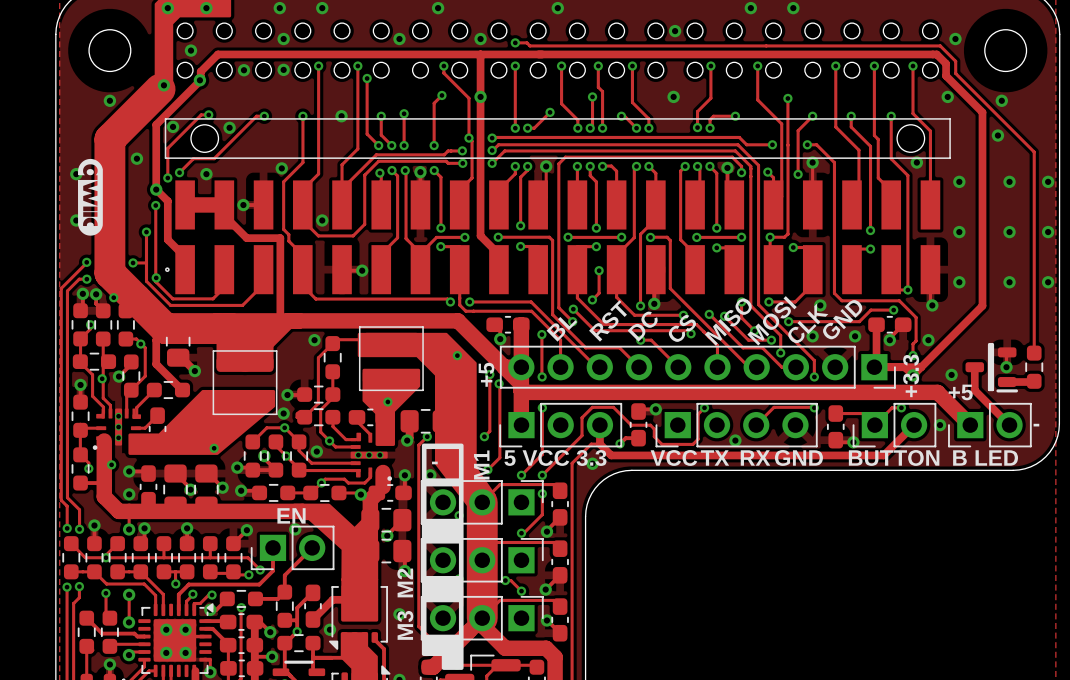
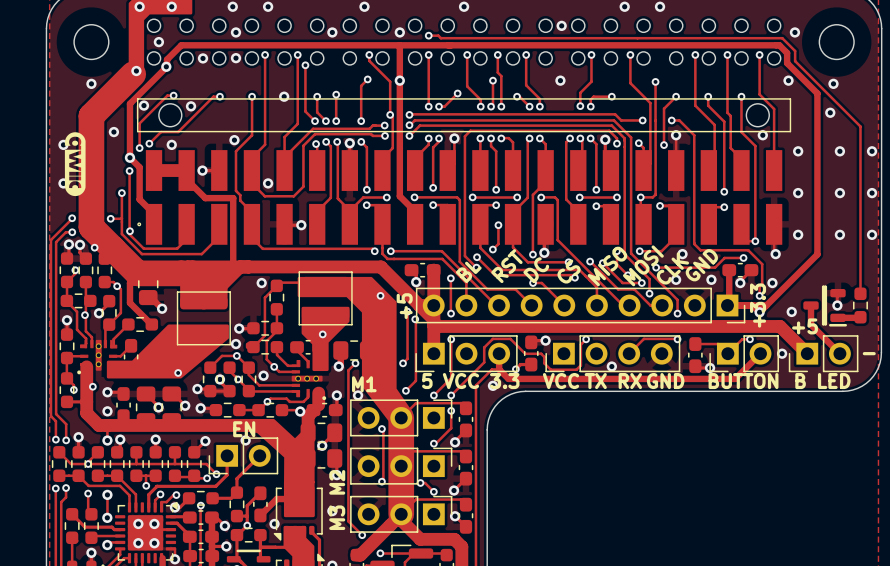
drawing: [421, 443, 464, 670] -> none
text: - (434, 462) -> M1 (364, 384)
text: M1 (481, 464) -> none

